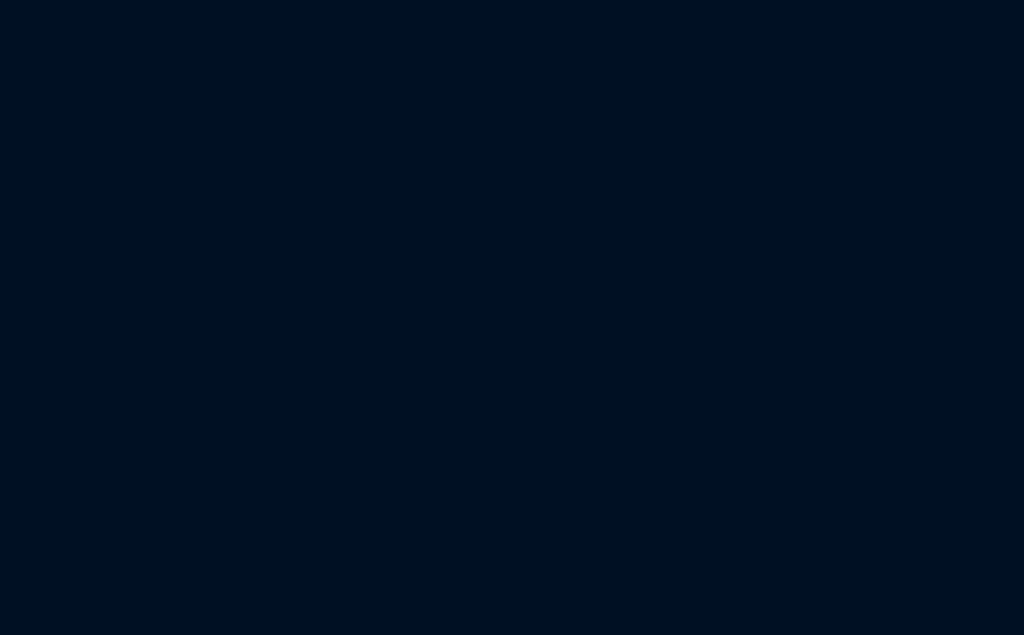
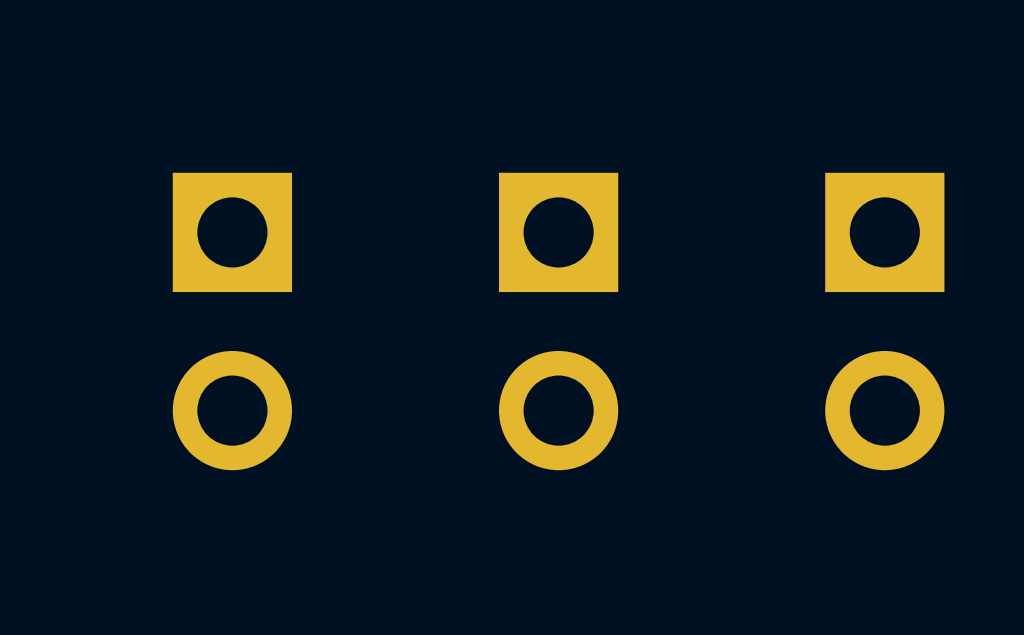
part: none -> (232, 321)
part: none -> (558, 321)
part: none -> (884, 321)

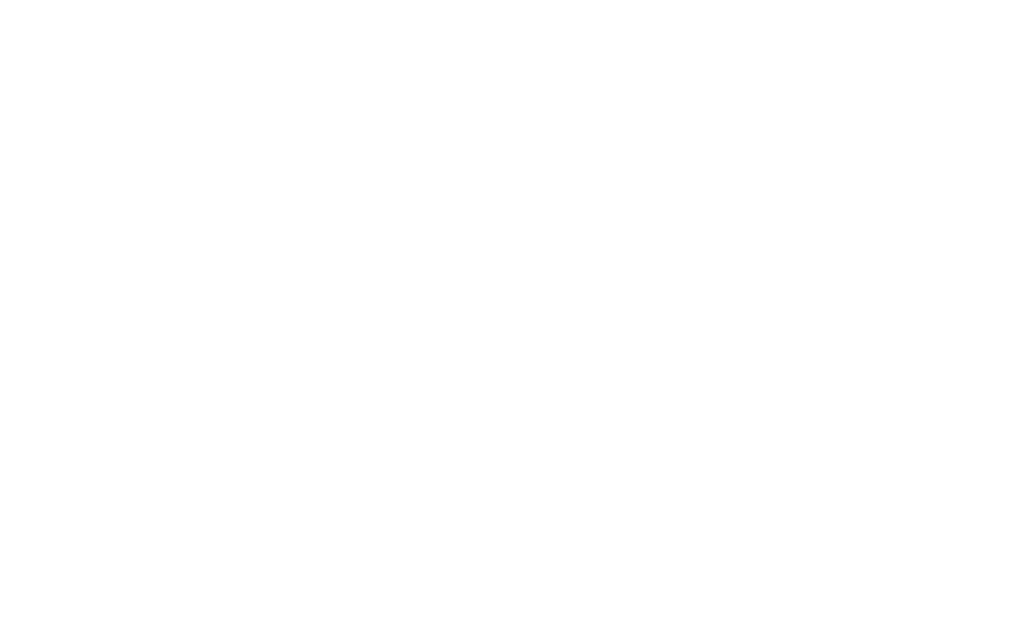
part: (232, 321) -> none
part: (558, 321) -> none
part: (884, 321) -> none

